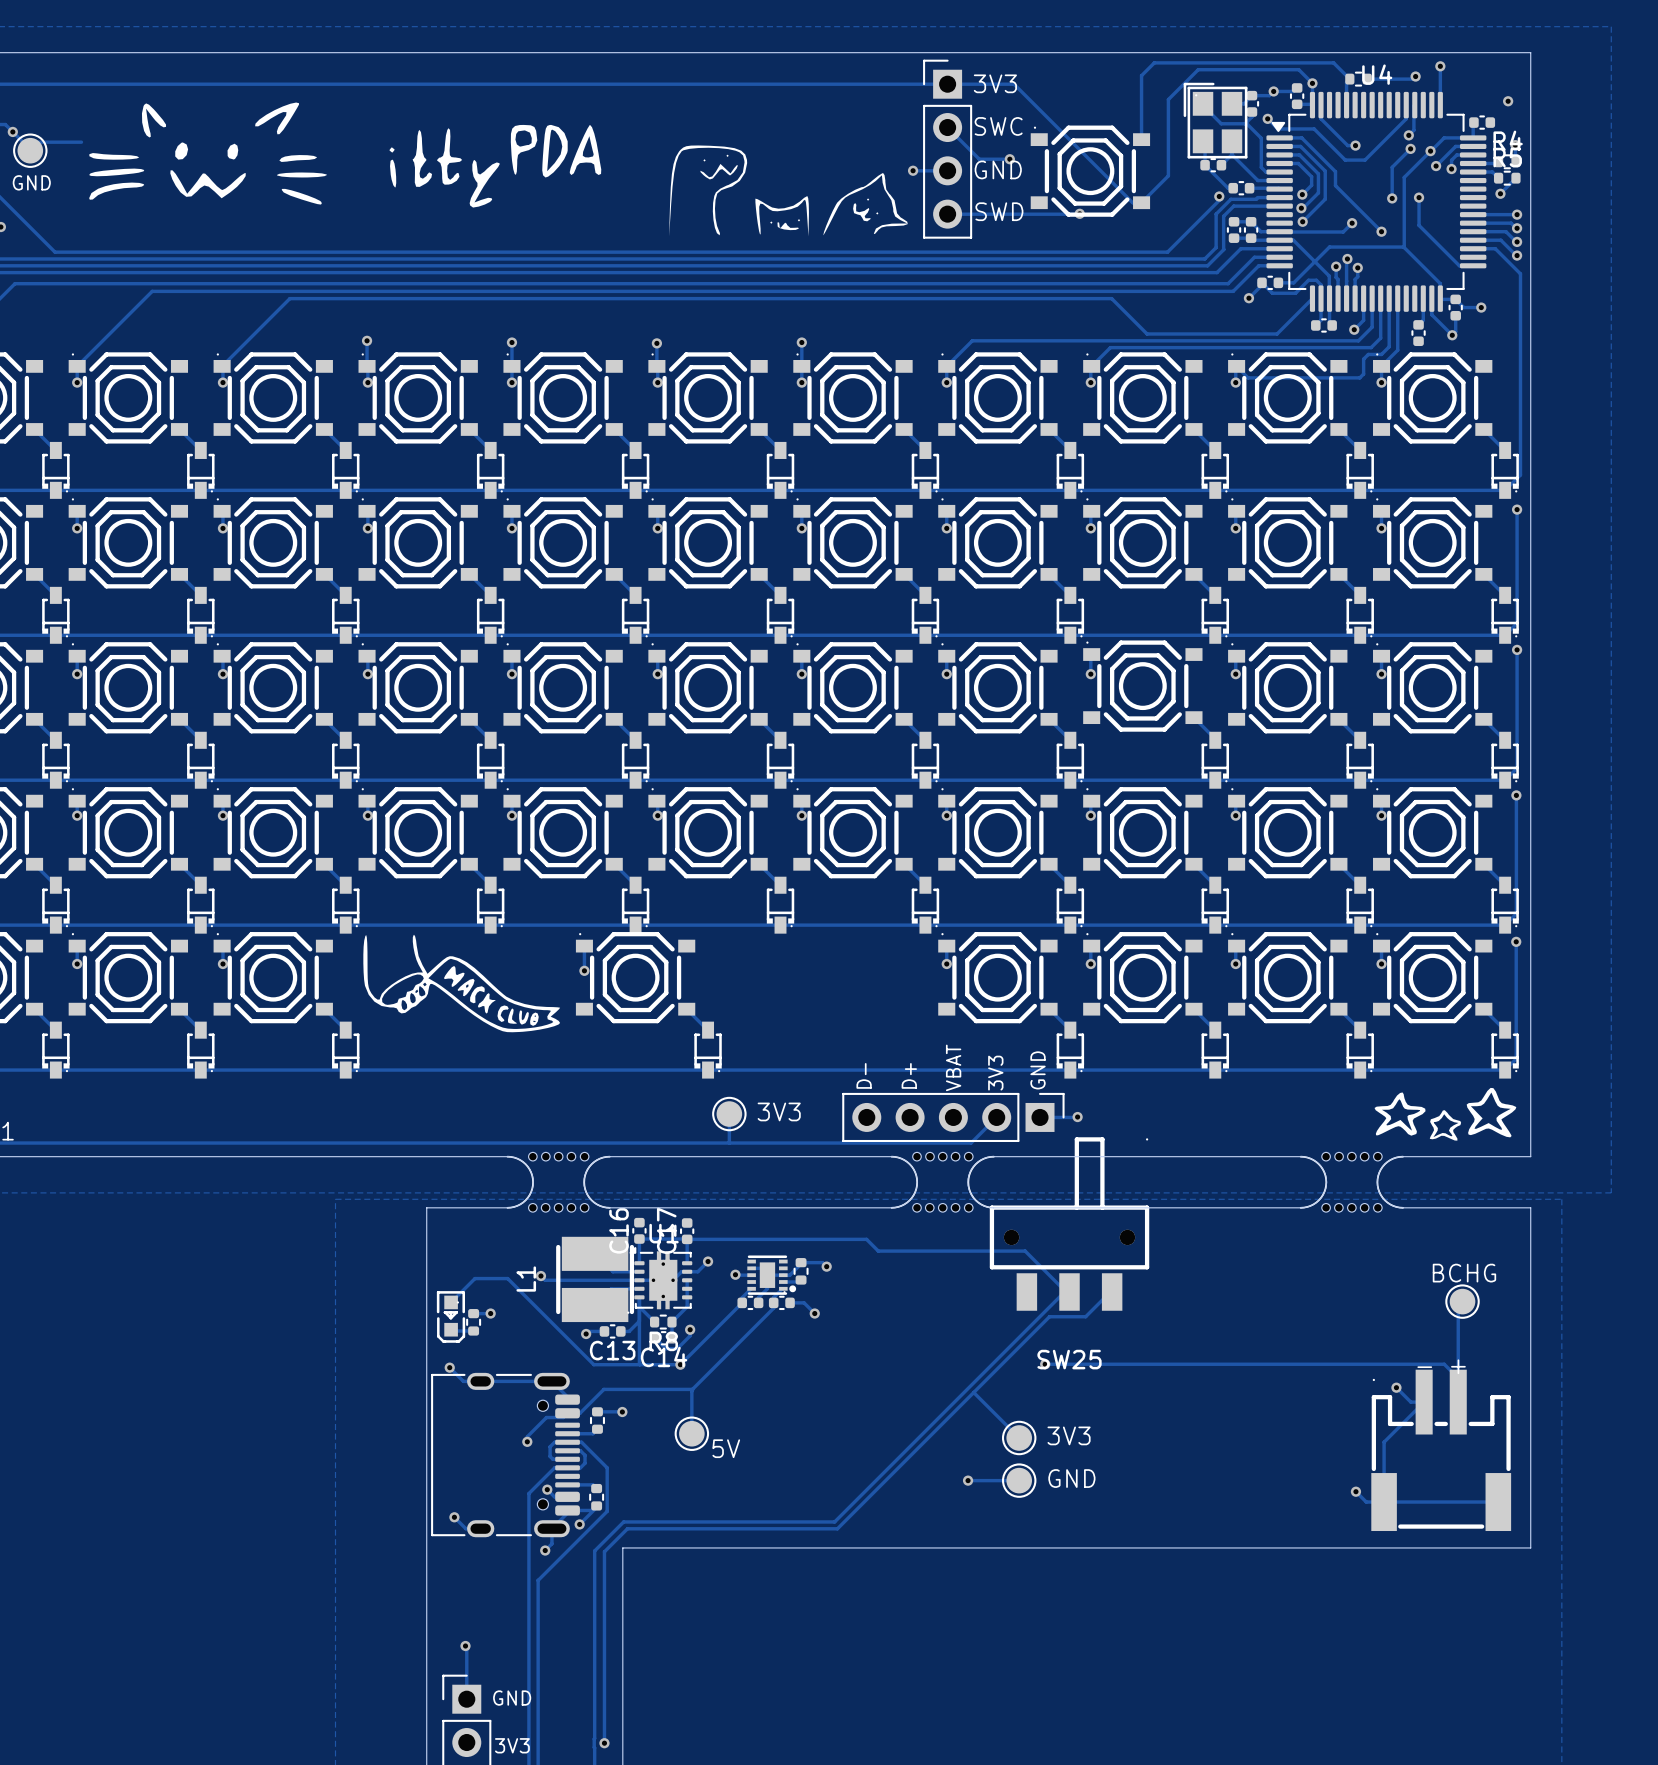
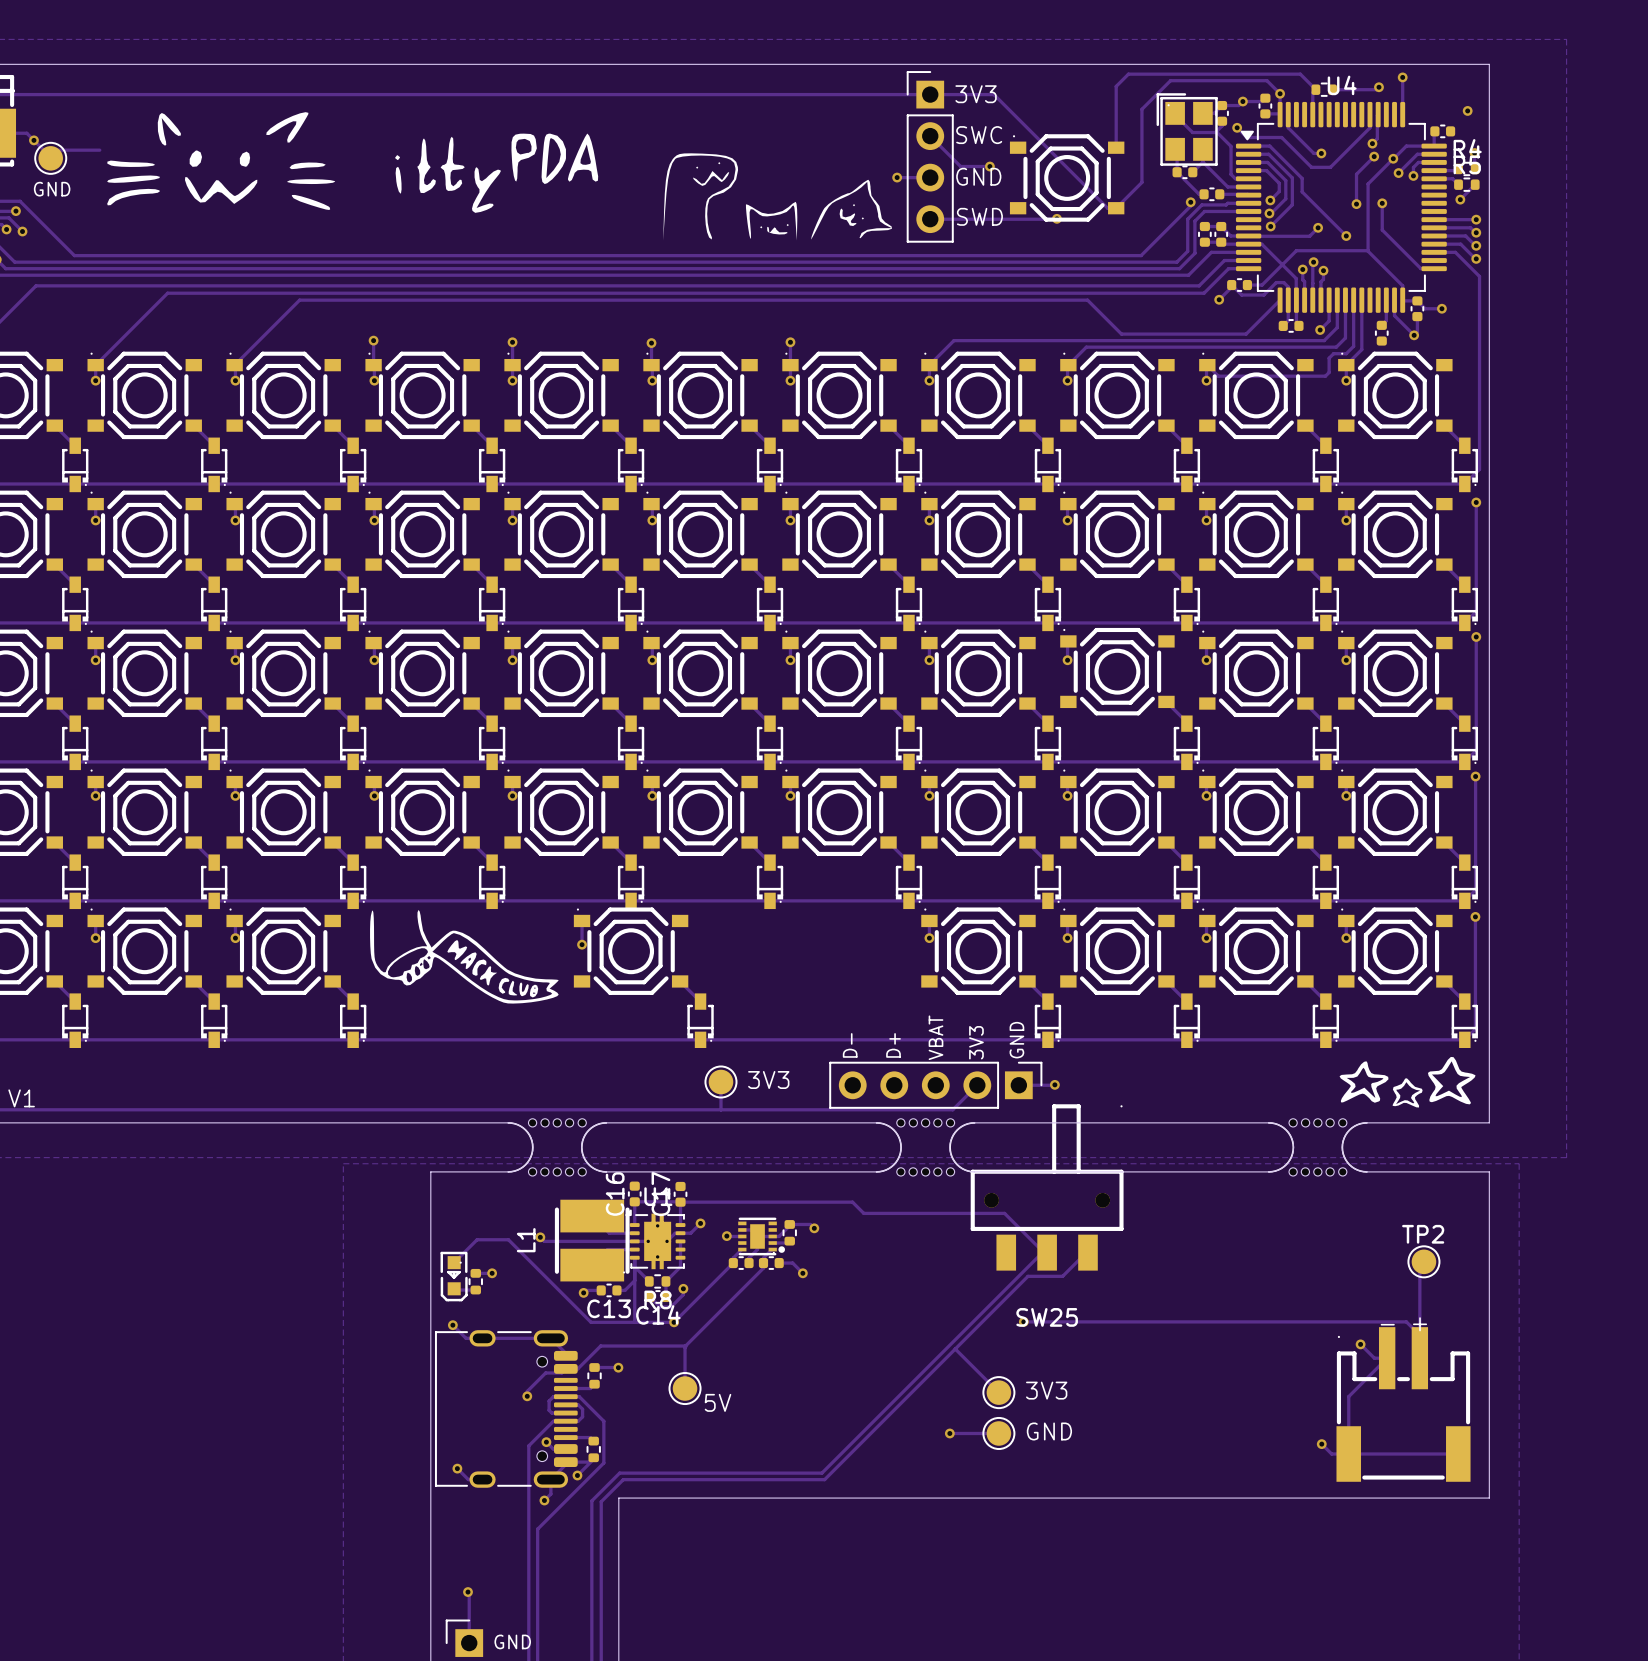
TP2 name: none -> TP2 (1423, 1234)
text: BCHG (1464, 1273) -> none

